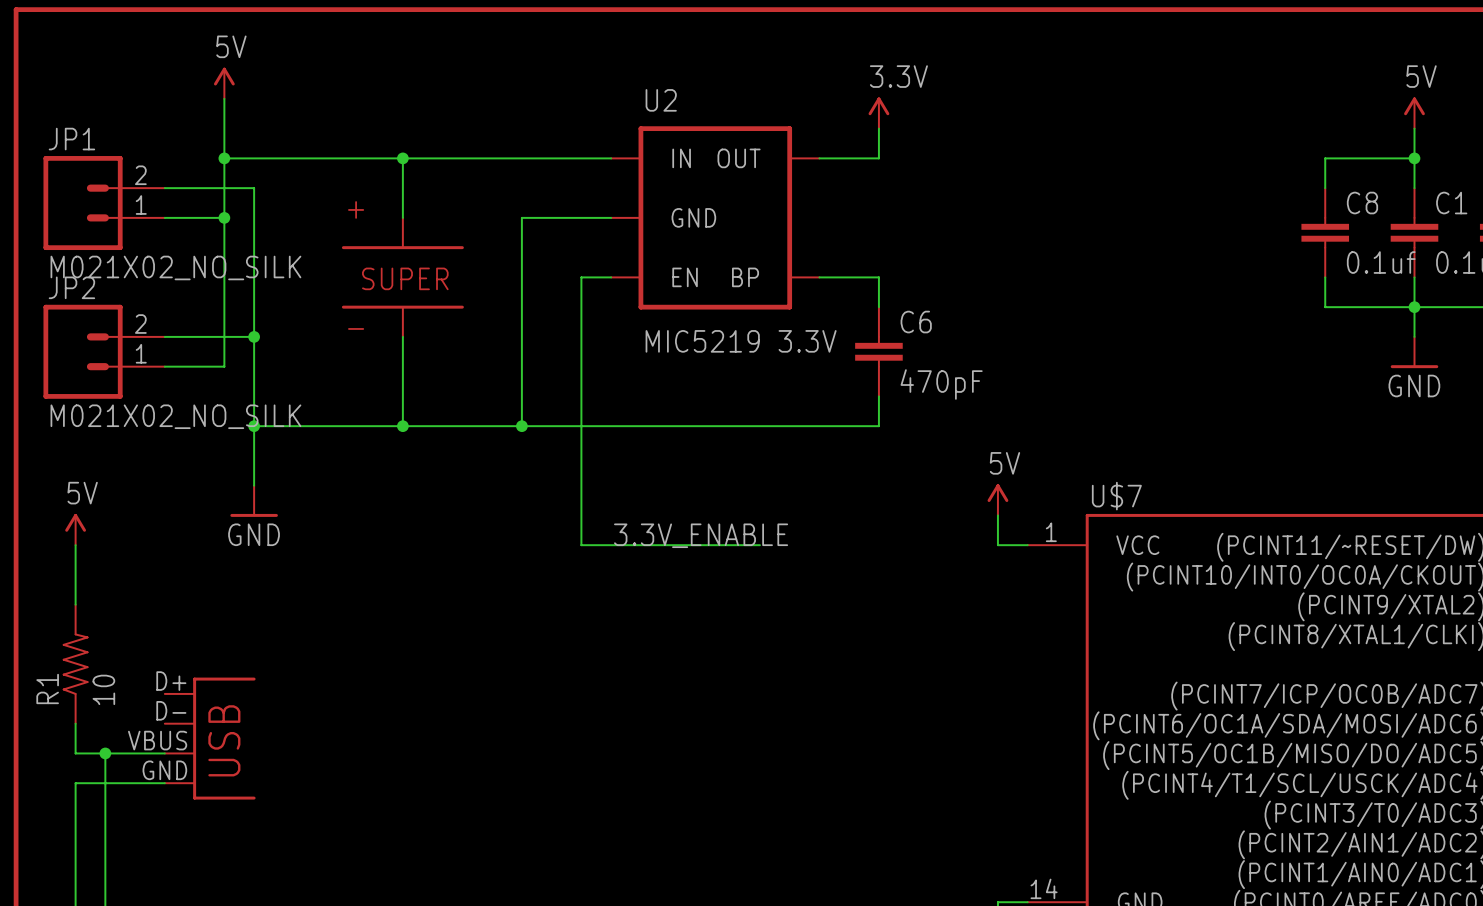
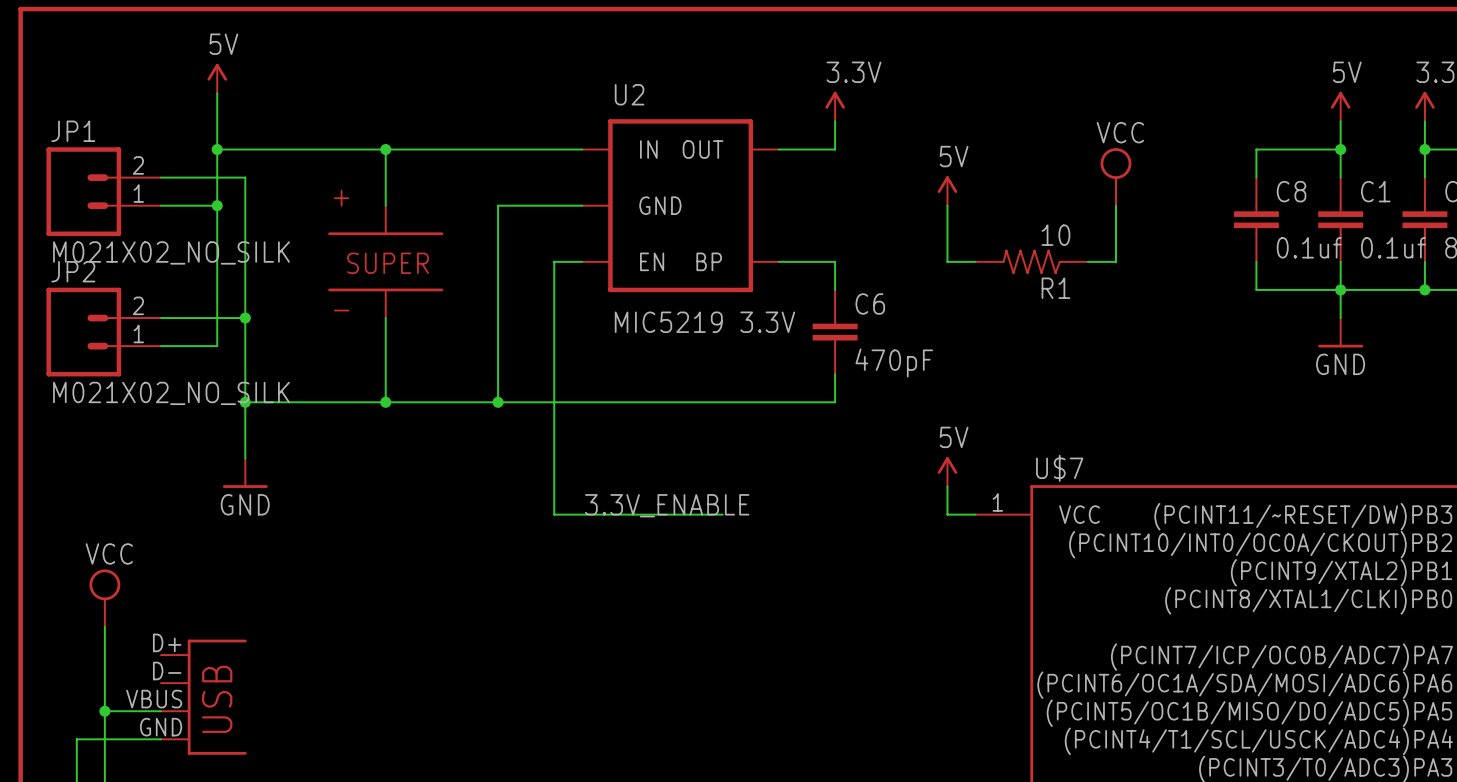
power symbol: none -> VCC (1115, 176)
power symbol: none -> 5V (947, 190)
wire: none -> (947, 205) (947, 261) (975, 261)
wire: none -> (1115, 205) (1115, 261) (1087, 261)
power symbol: 5V (75, 529) -> none
wire: (75, 545) (75, 604) -> none
power symbol: none -> VCC (104, 598)
R1 rotation: 0° (75, 664) -> 90° counterclockwise (1031, 261)
R1 position: (75, 664) -> (1031, 261)
wire: (75, 723) (75, 753) (105, 753) -> (104, 626) (104, 711)

